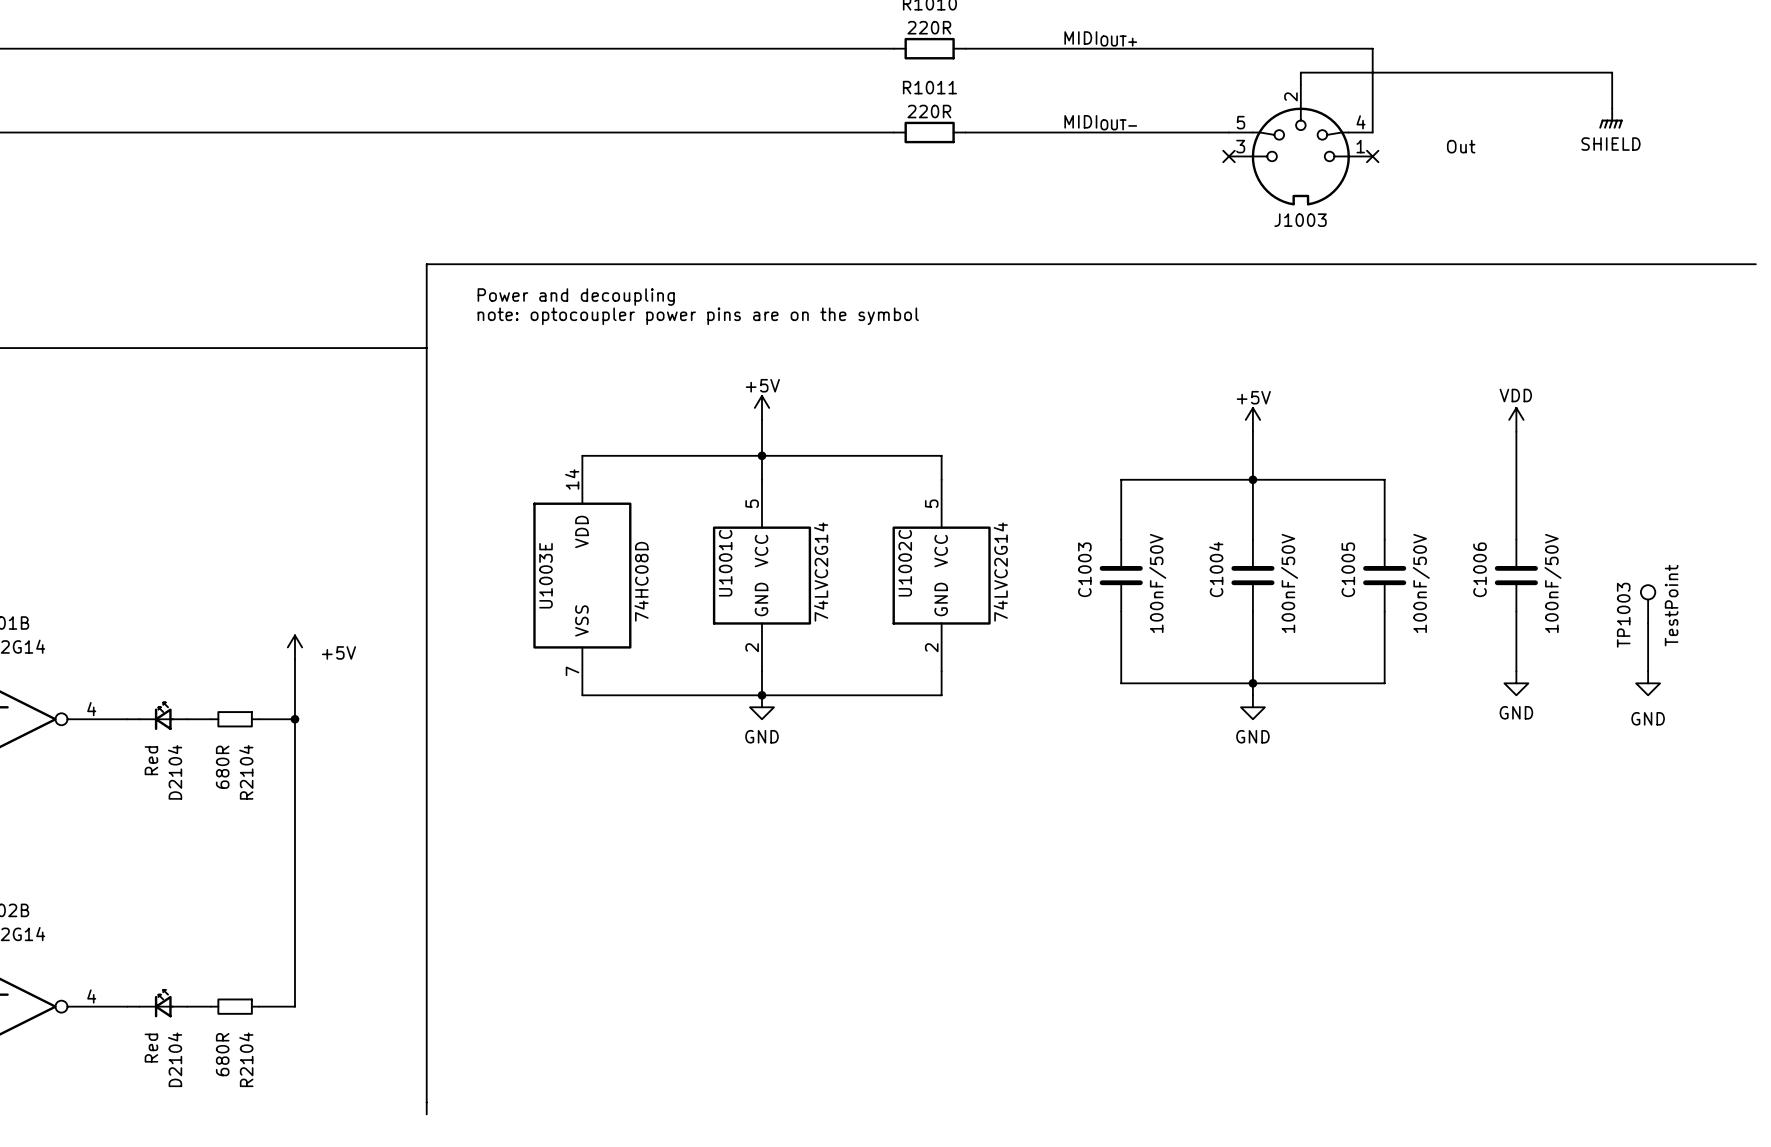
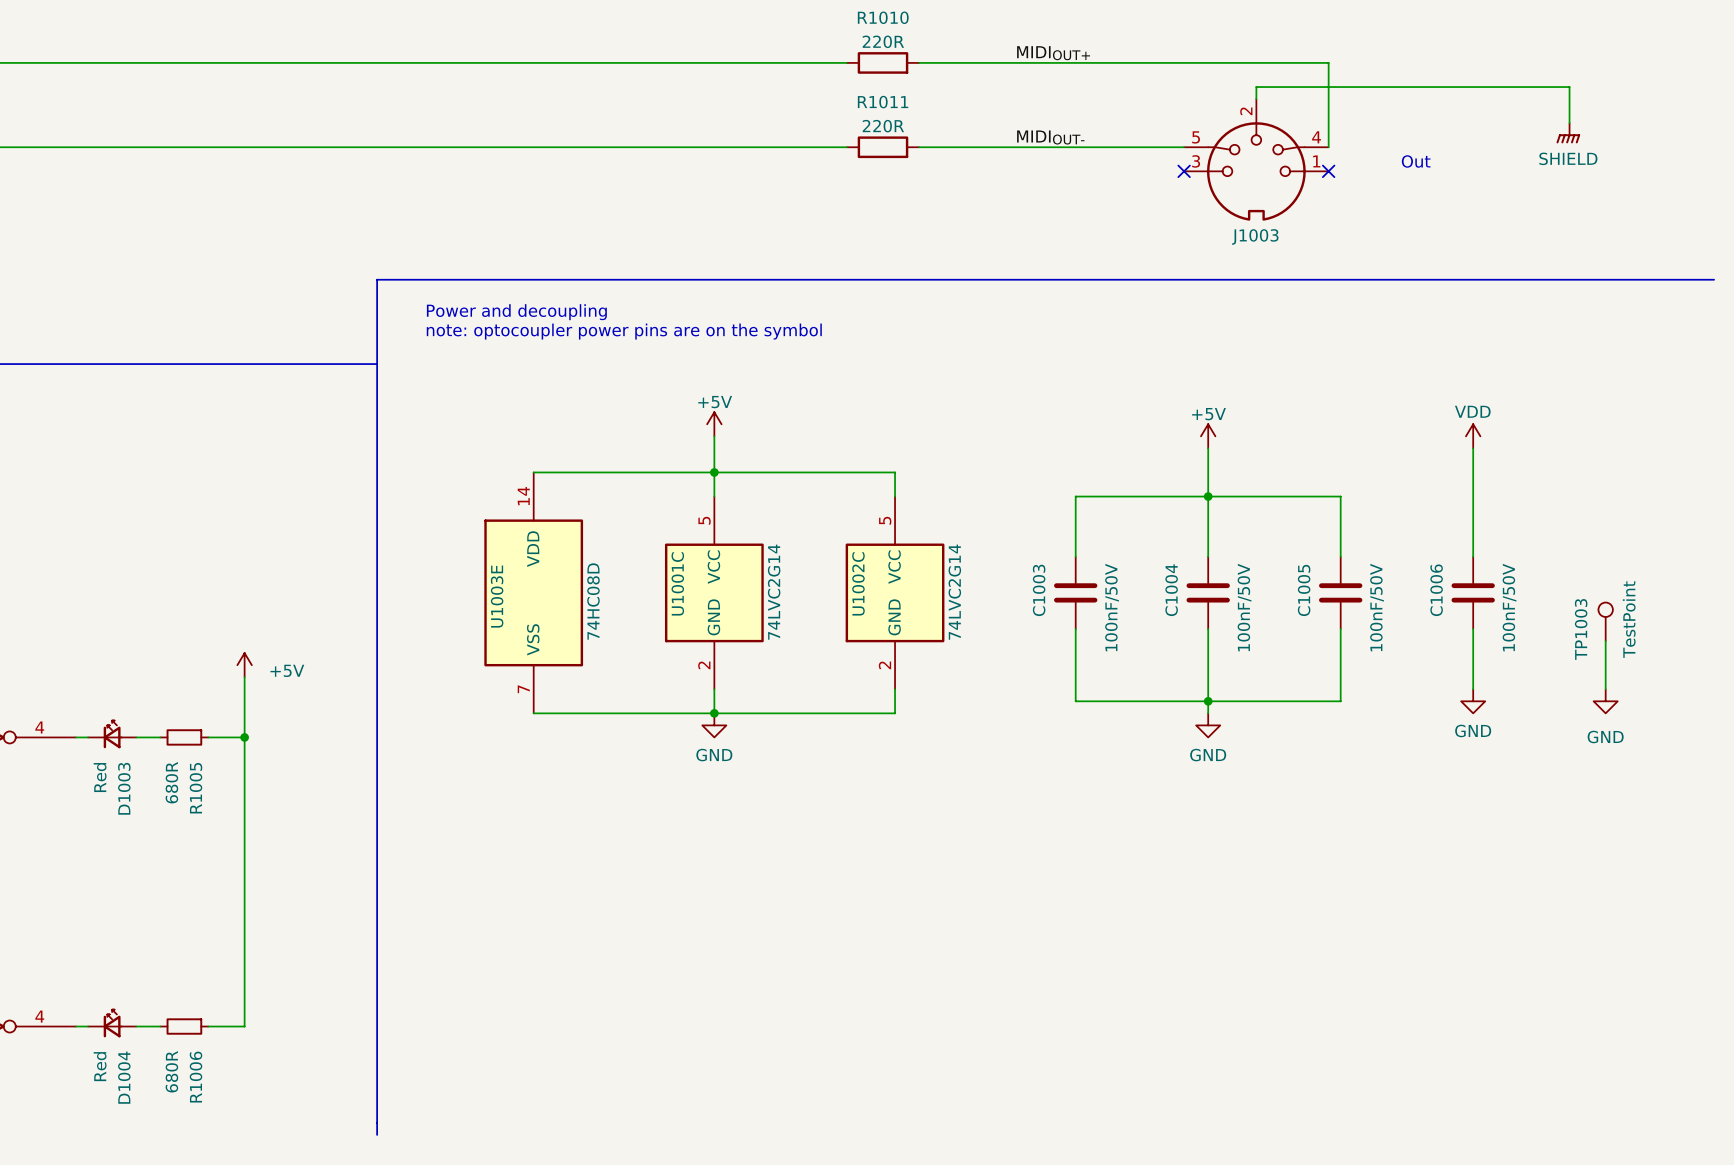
D2104 name: D2104 (175, 772) -> D1003 (124, 788)
R2104 name: R2104 (246, 772) -> R1005 (195, 788)
D2104 name: D2104 (175, 1059) -> D1004 (124, 1077)
R2104 name: R2104 (246, 1059) -> R1006 (195, 1077)

